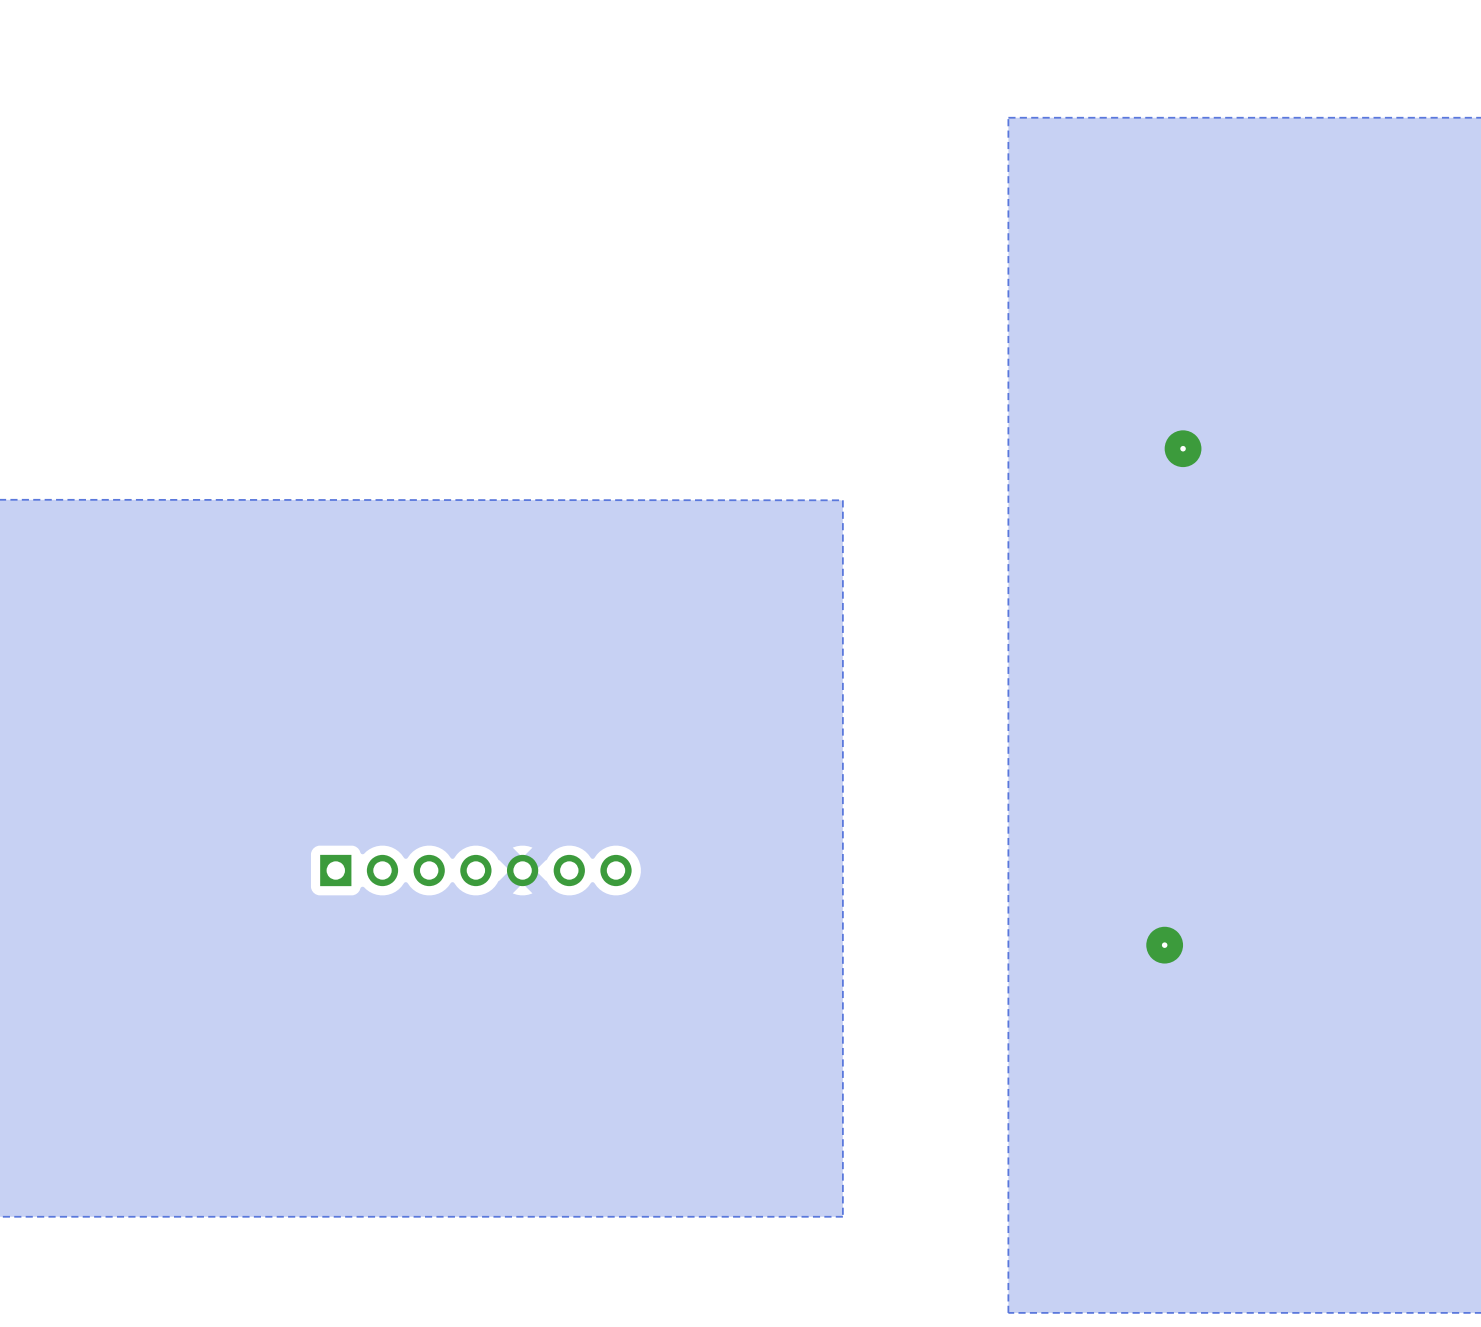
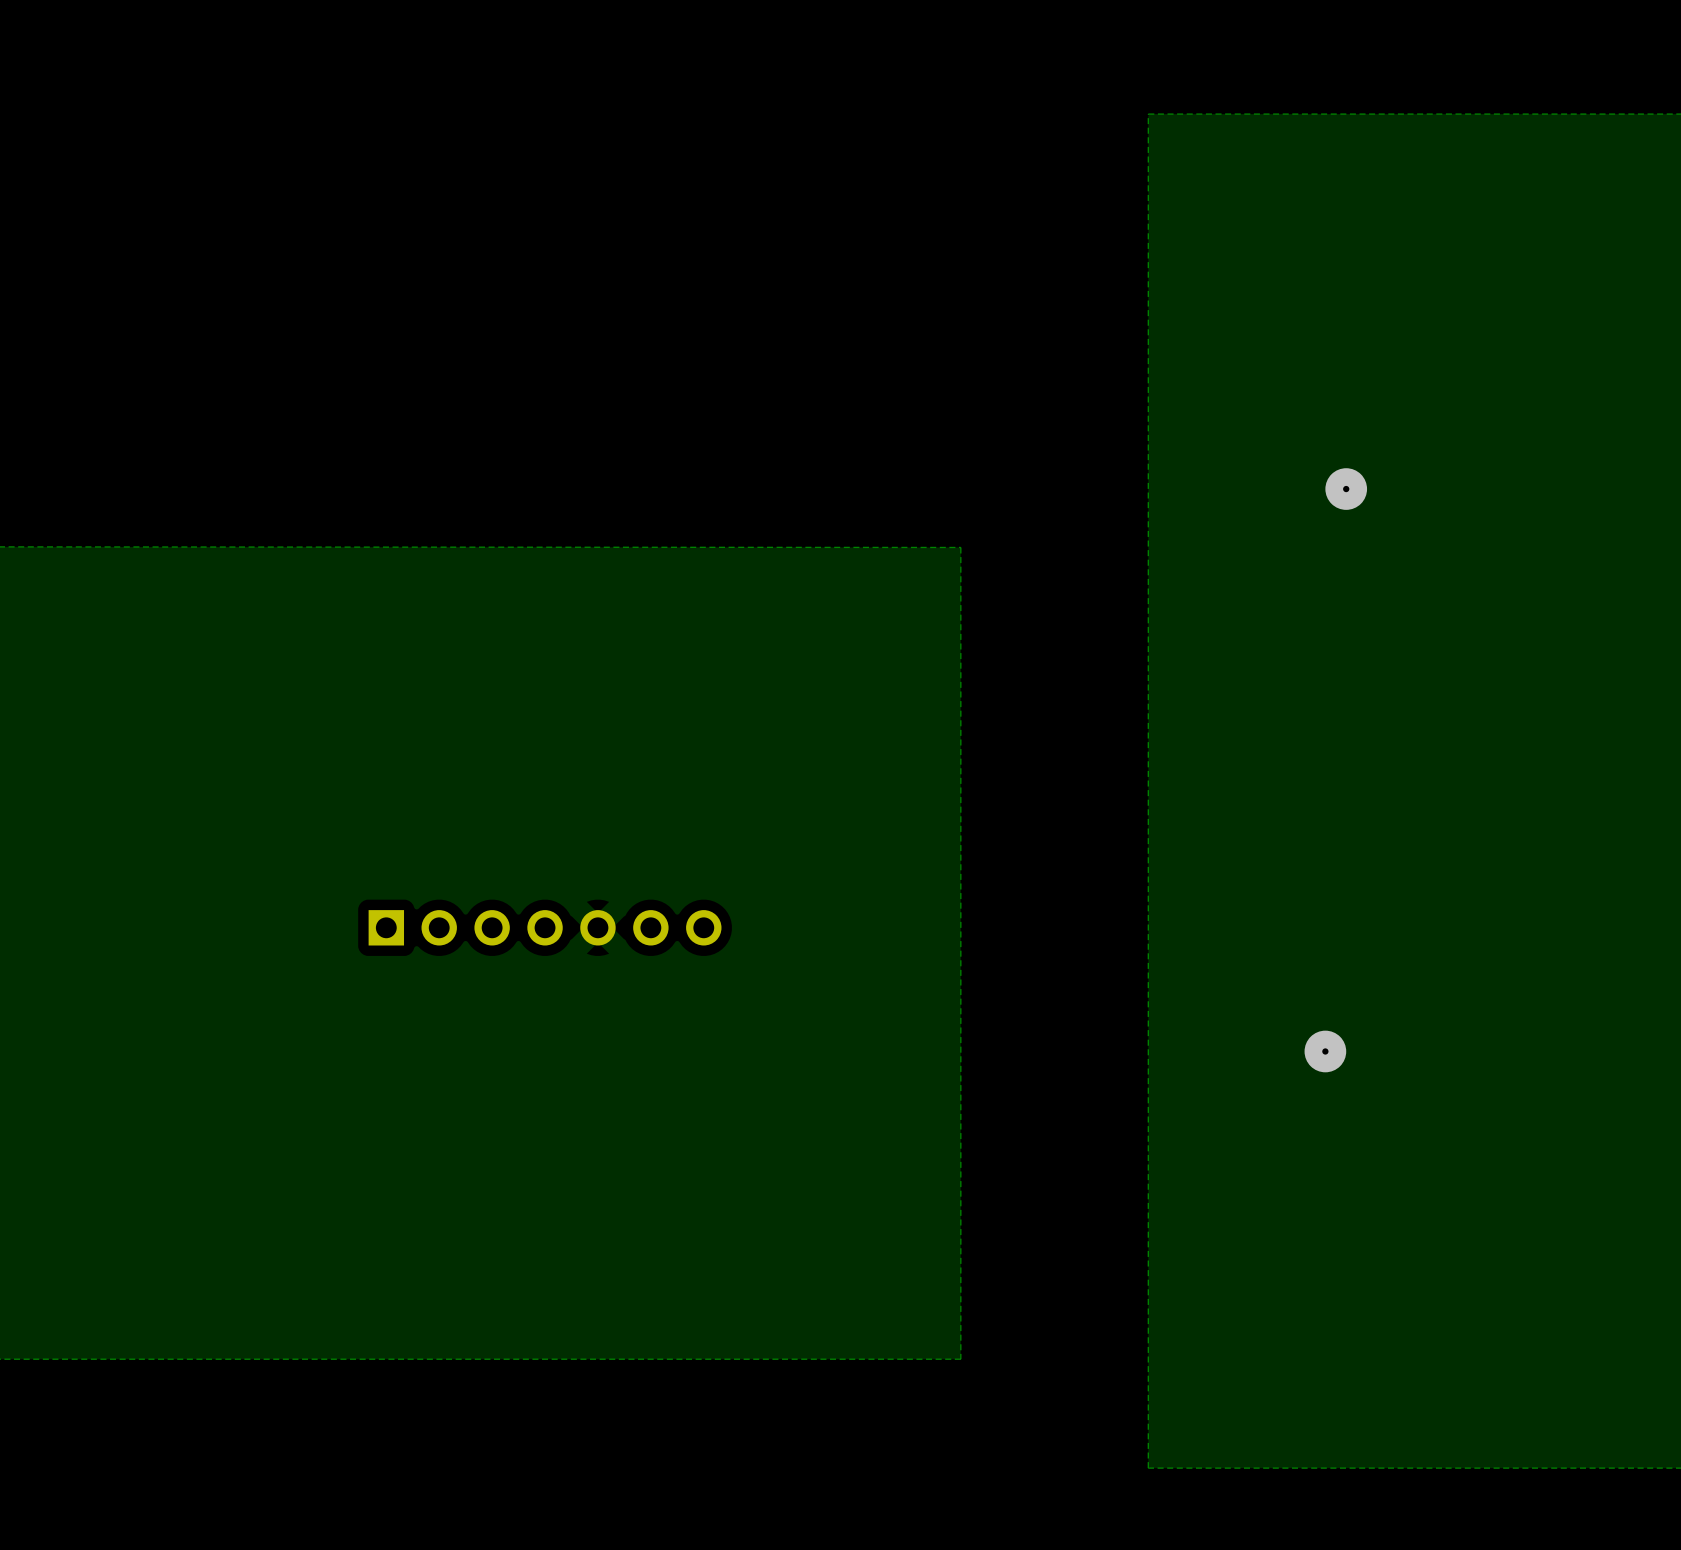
part position: (475, 870) -> (545, 927)

